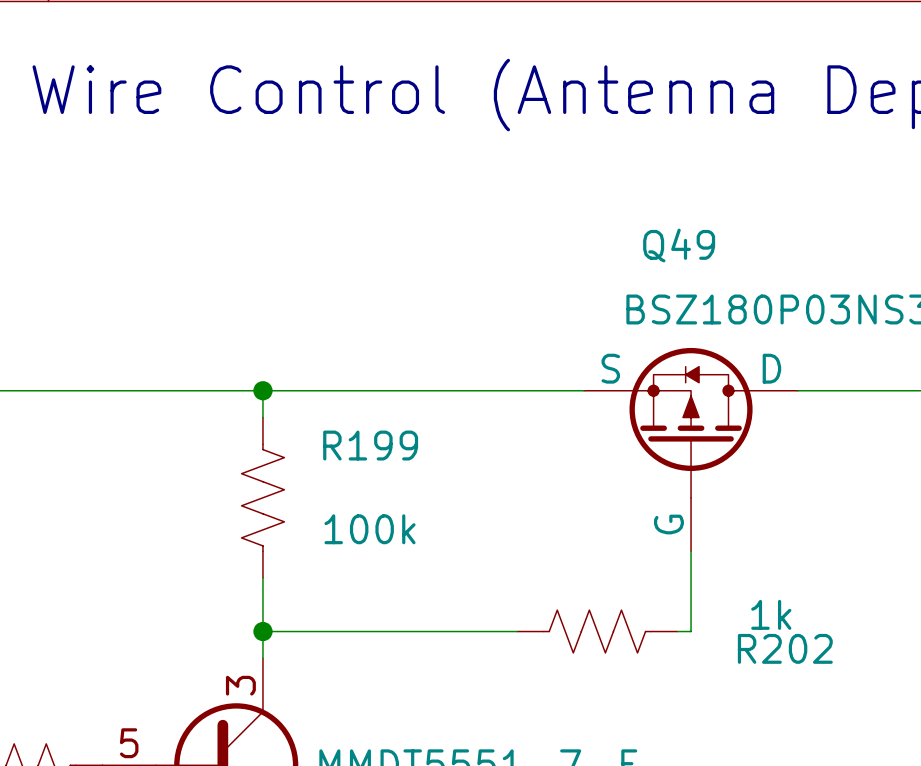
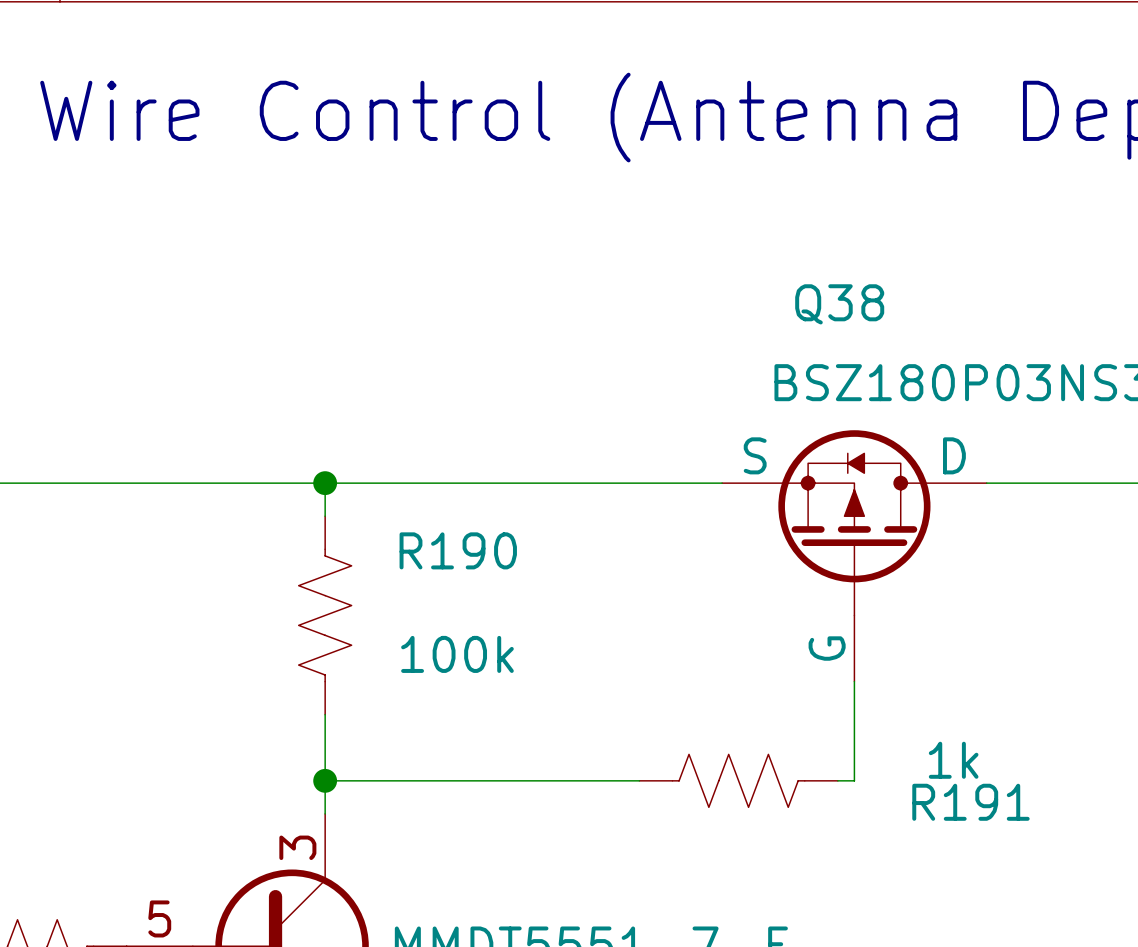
Q49 name: Q49 (679, 245) -> Q38 (839, 304)
R199 name: R199 (370, 445) -> R190 (458, 550)
R202 name: R202 (785, 648) -> R191 (970, 802)

